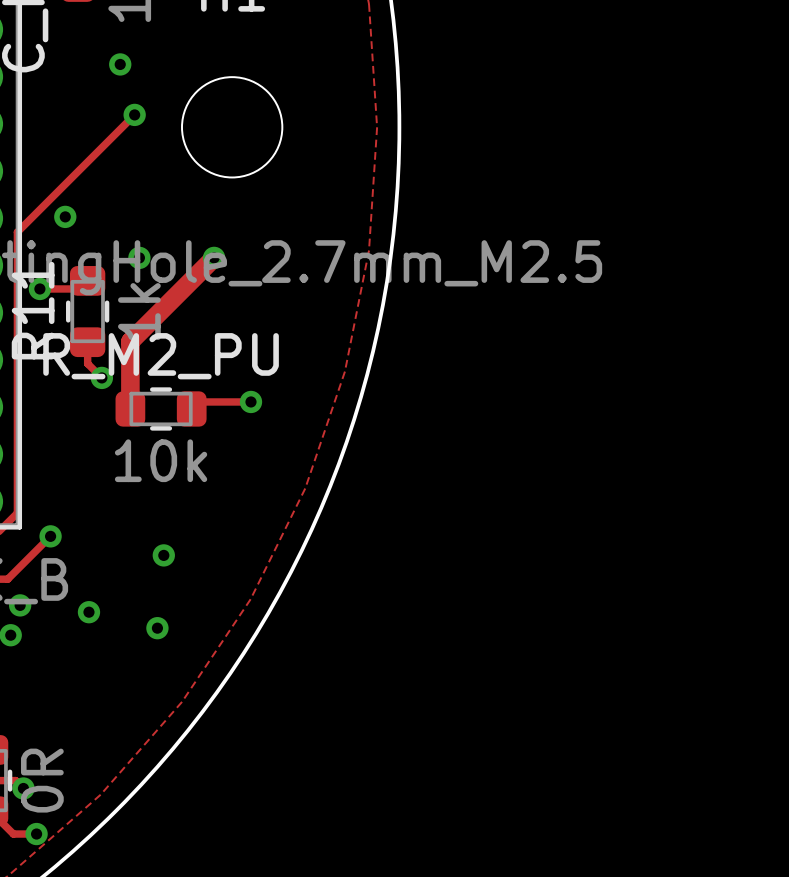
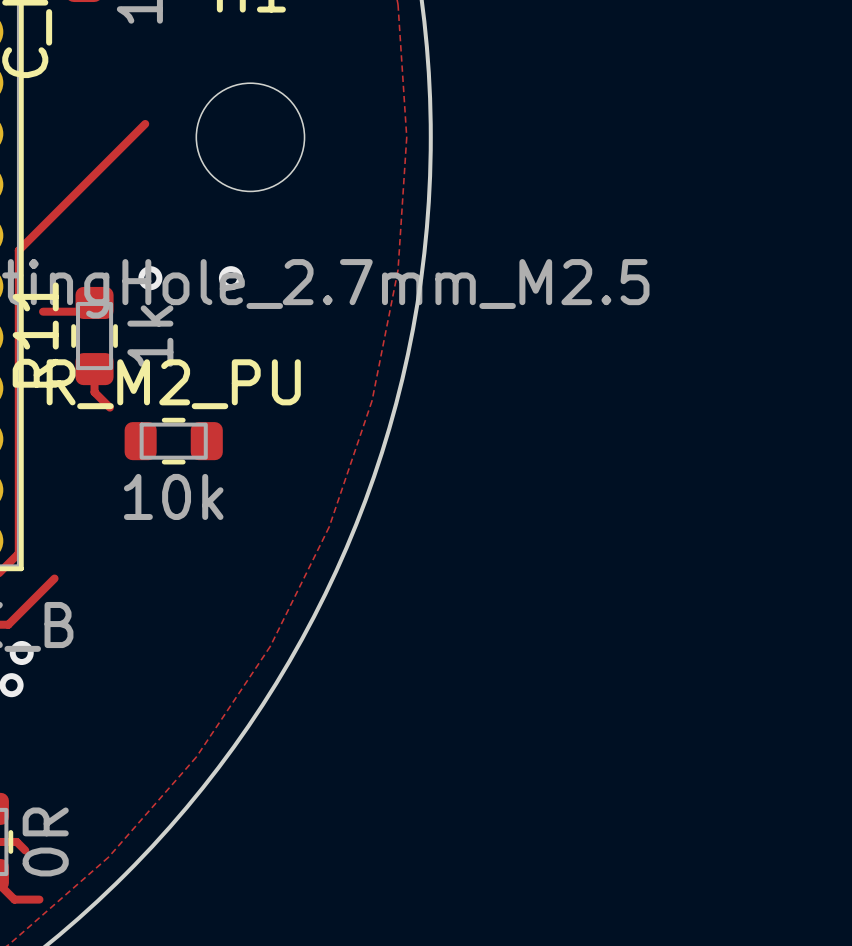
via: (120, 64) -> none
via: (134, 114) -> none
via: (65, 216) -> none
track: (214, 257) (130, 341) (130, 408) -> none
via: (39, 288) -> none
via: (101, 377) -> none
track: (250, 401) (198, 401) (191, 408) -> none
via: (250, 401) -> none
via: (50, 536) -> none
via: (163, 555) -> none
via: (88, 612) -> none
via: (157, 628) -> none
via: (23, 788) -> none
via: (36, 834) -> none

